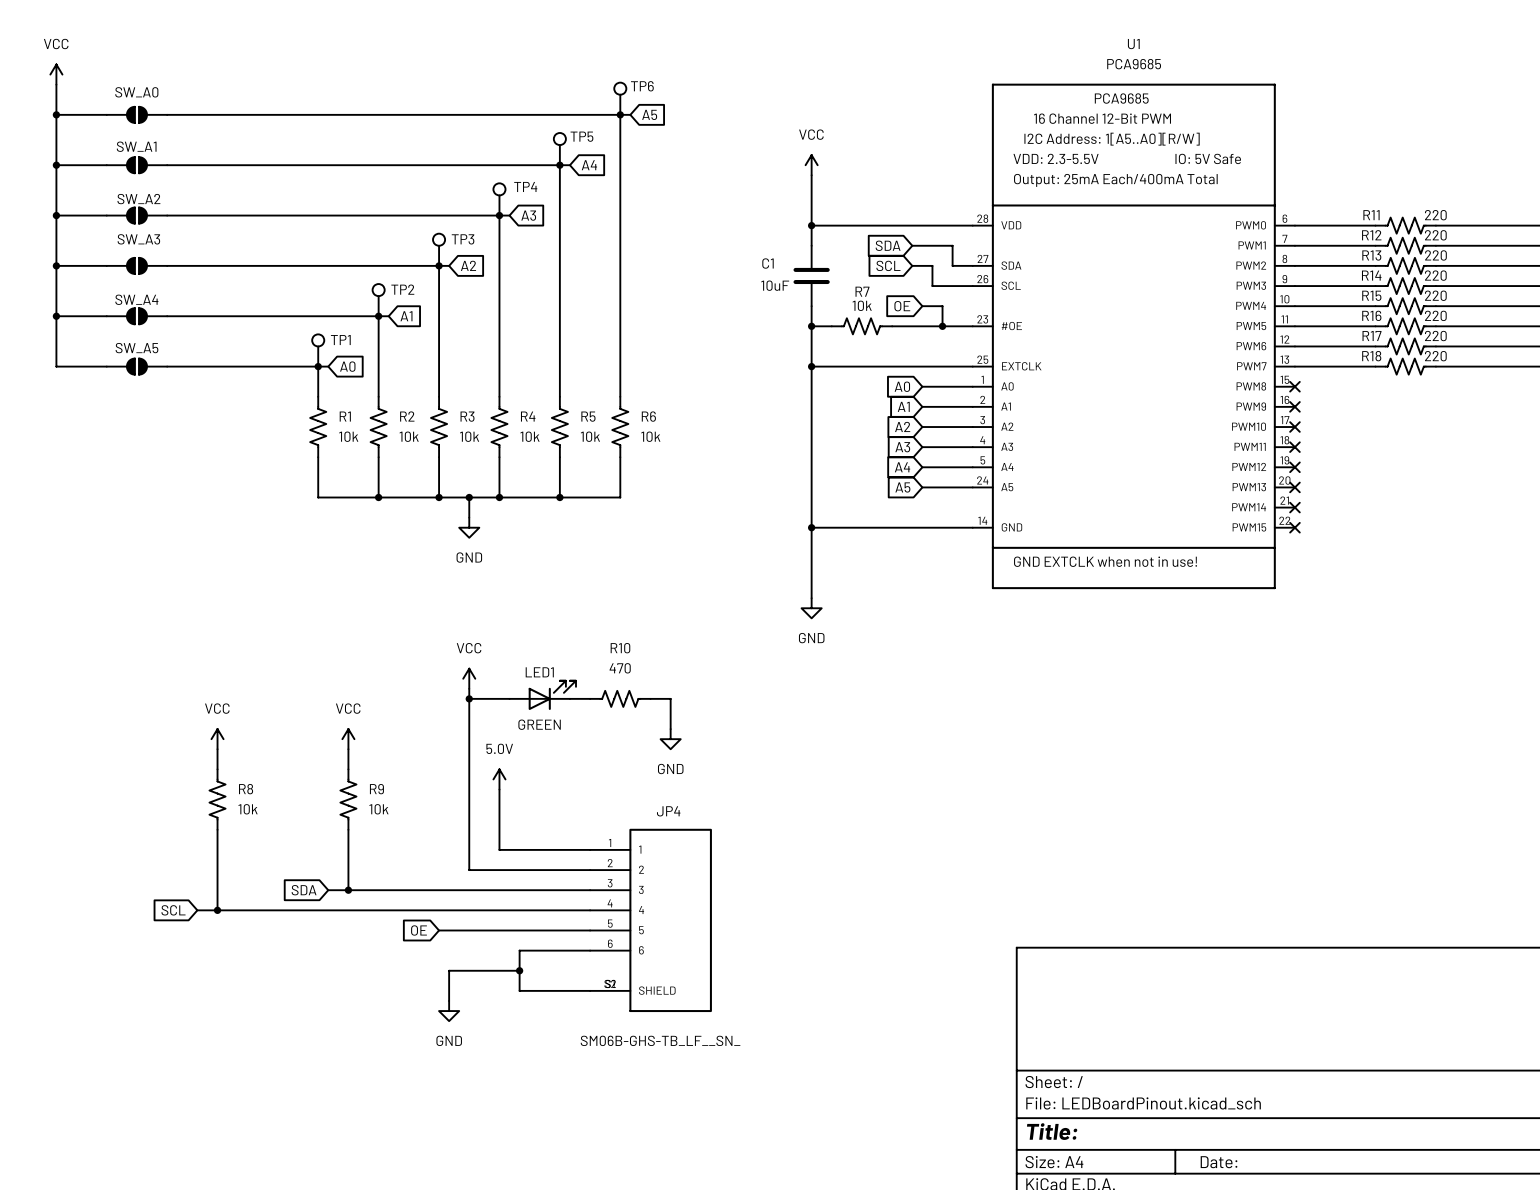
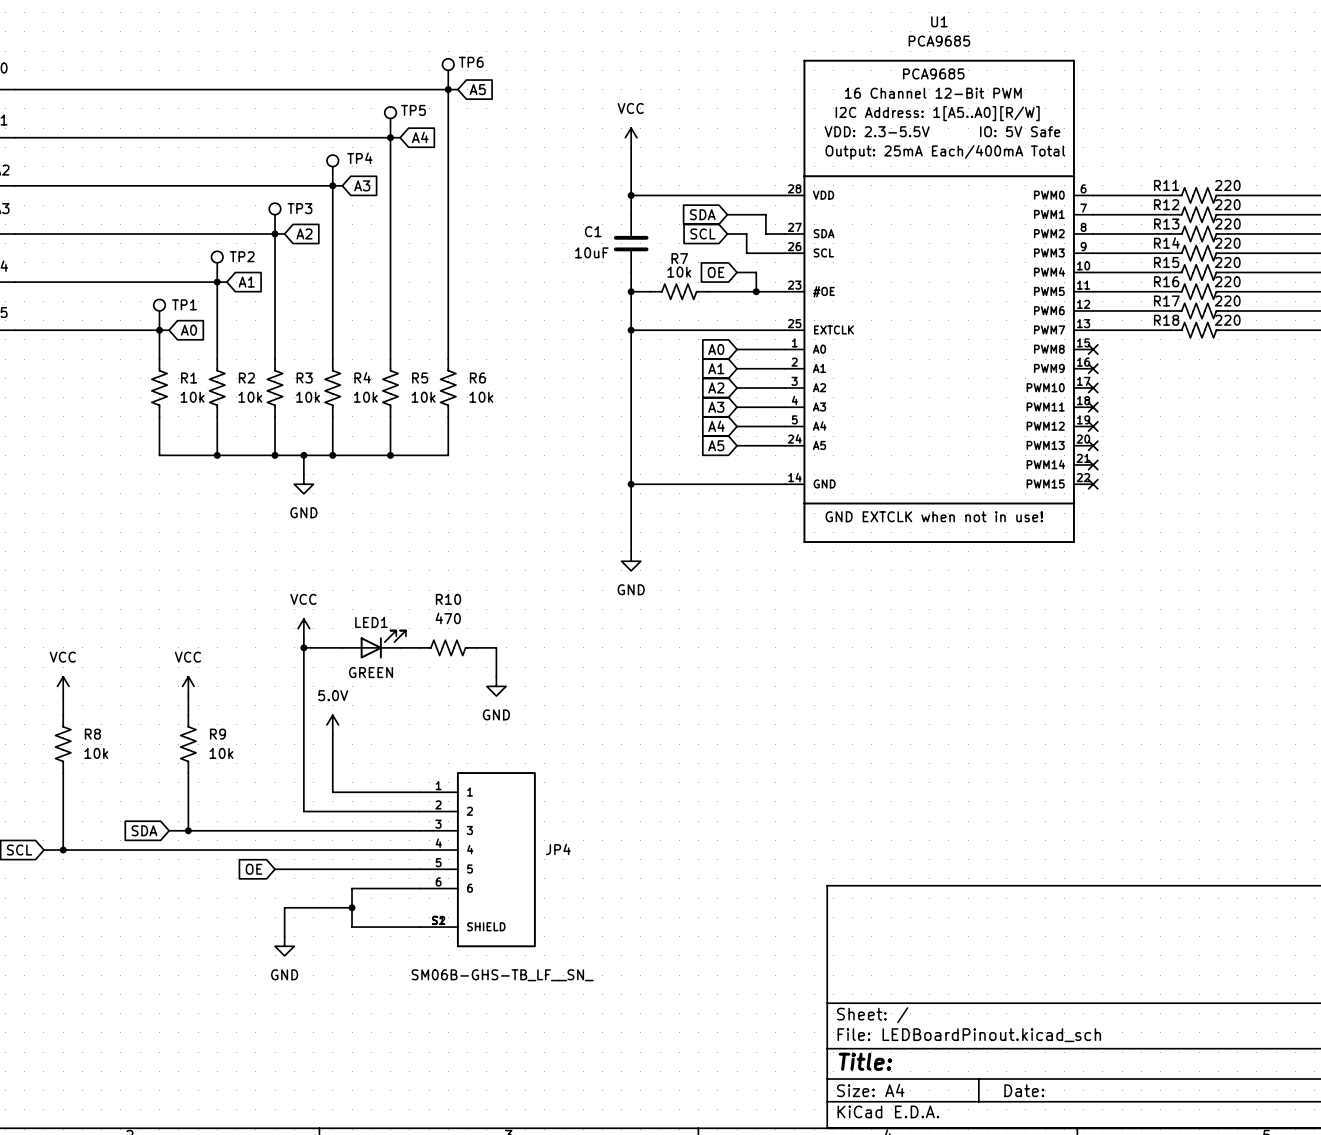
JP4 name position: JP4 (668, 811) -> JP4 (558, 849)

